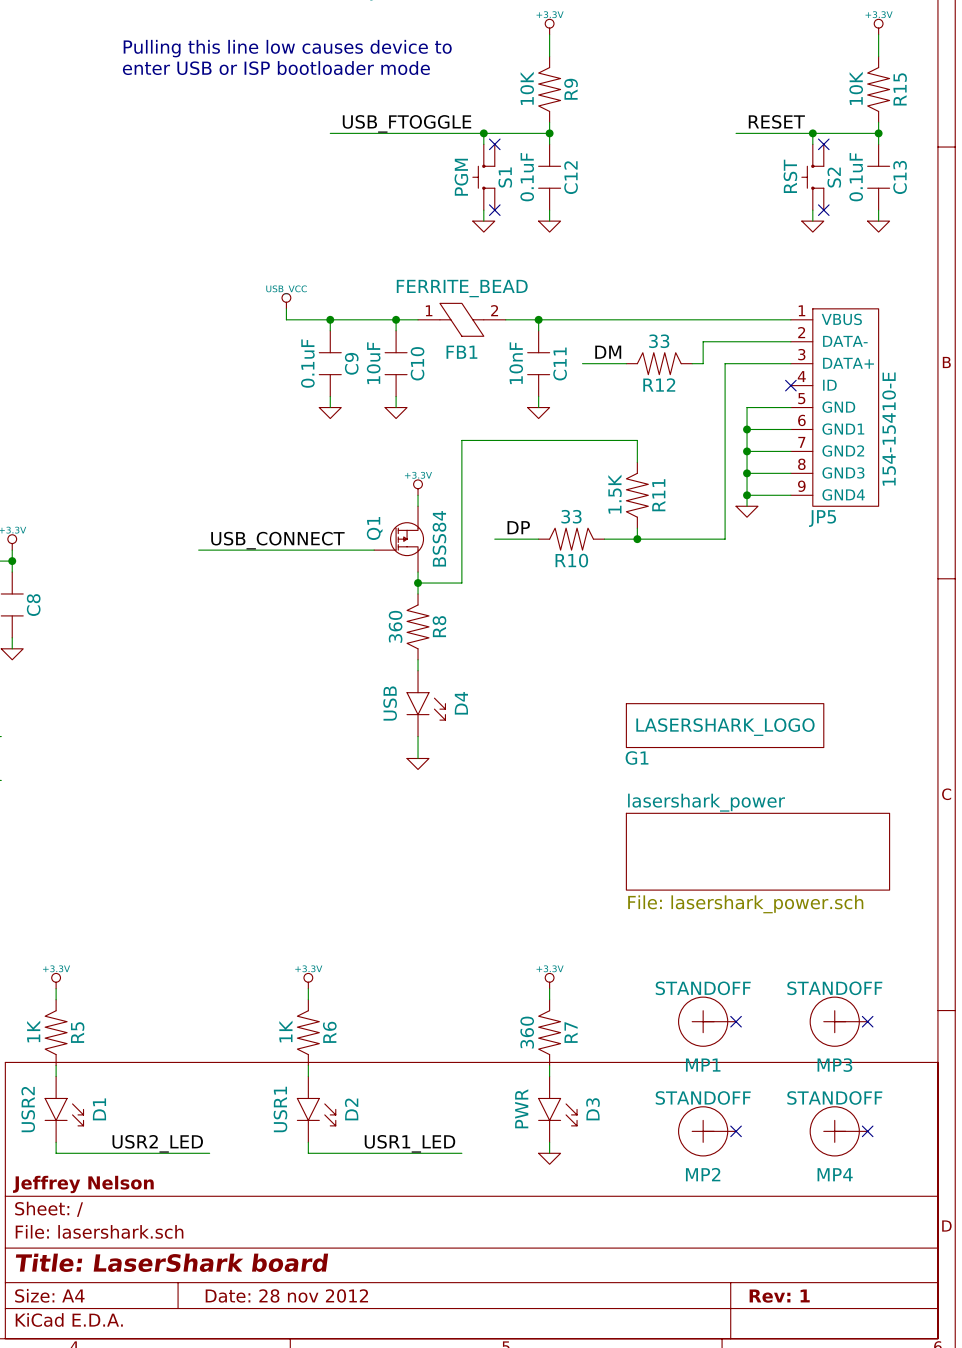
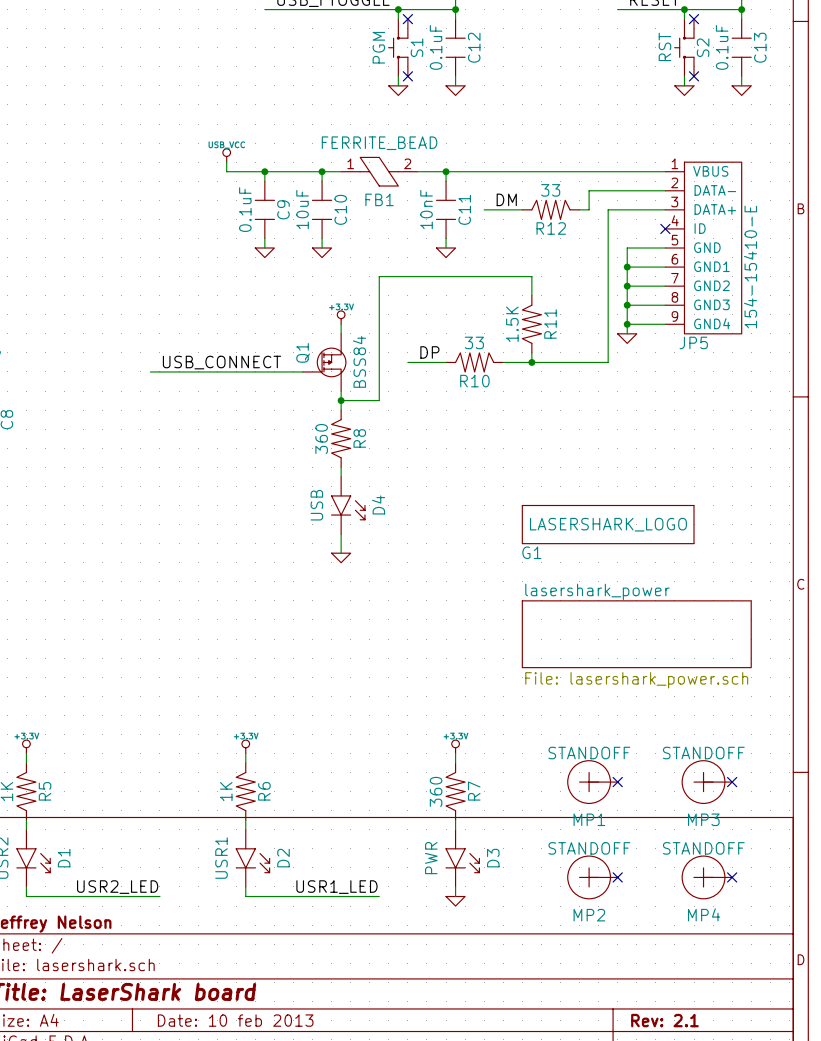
title block: Date: 28 nov 2012 (286, 1295) -> Date: 10 feb 2013 (235, 1020)
title block: Rev: 1 (779, 1296) -> Rev: 2.1 (664, 1020)

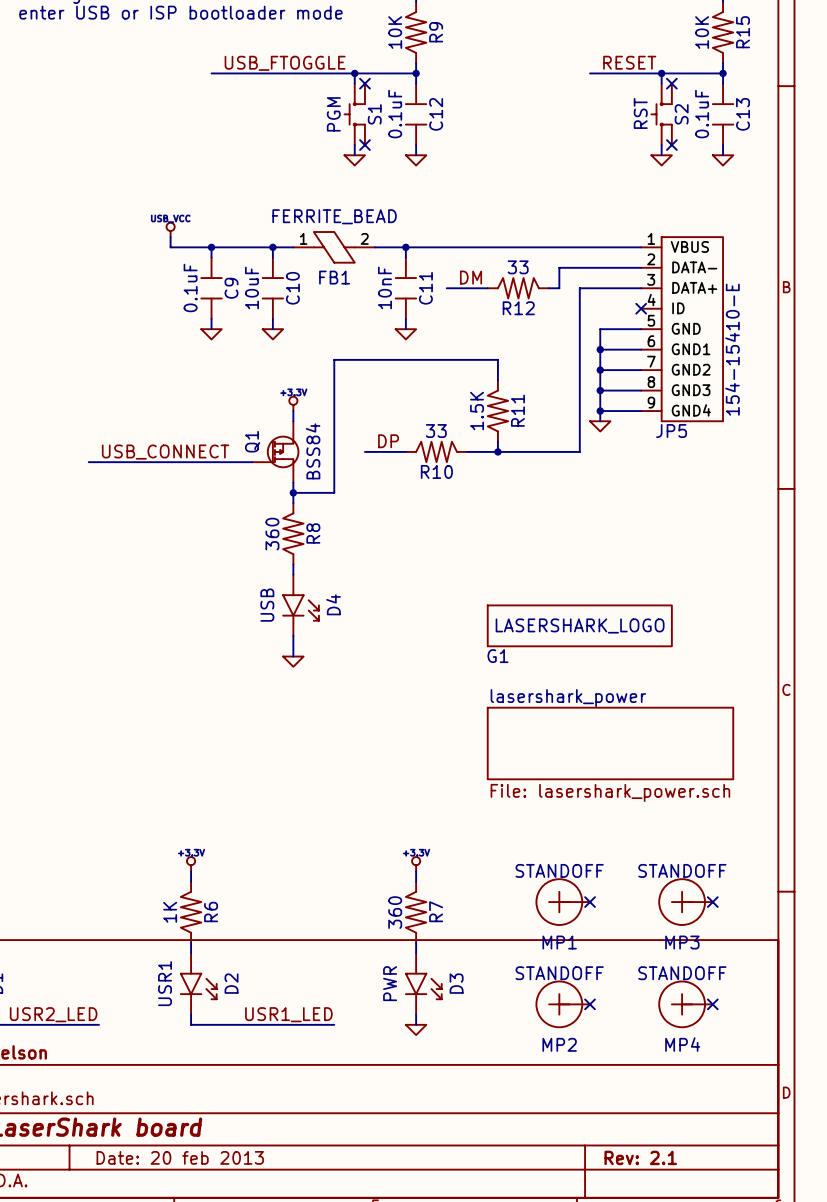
title block: Date: 10 feb 2013 (235, 1020) -> Date: 20 feb 2013 (180, 1157)

